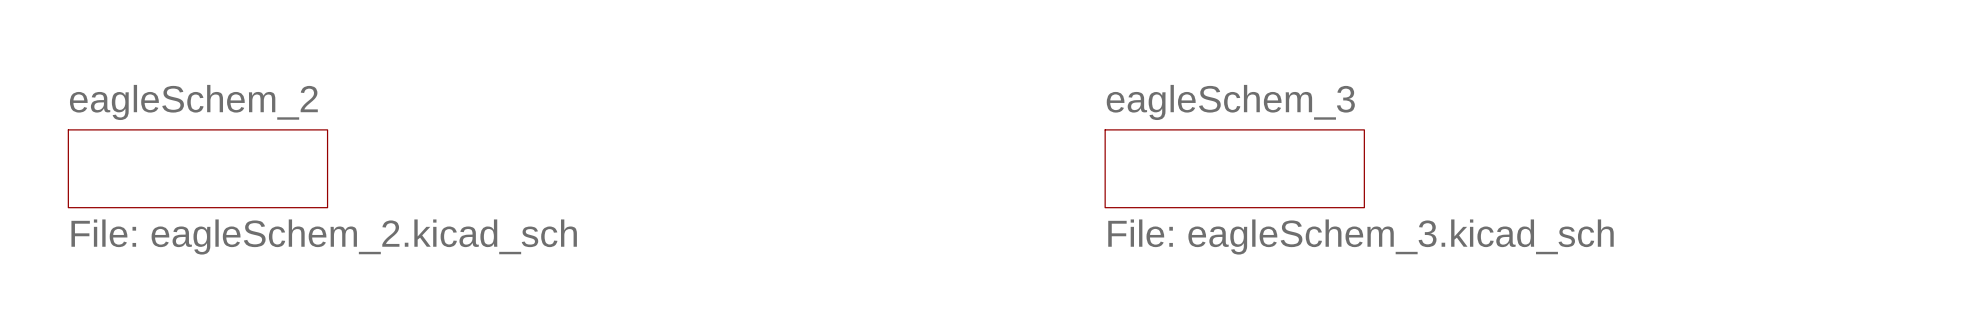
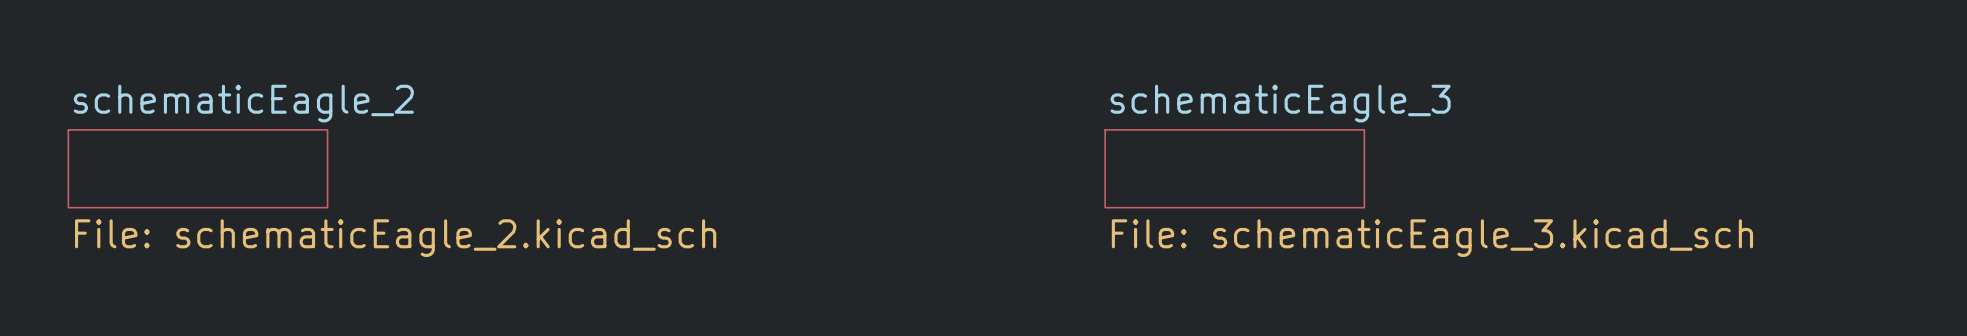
sheet eagleSchem_2 name: eagleSchem_2 (193, 102) -> schematicEagle_2 (243, 103)
sheet eagleSchem_3 name: eagleSchem_3 (1230, 102) -> schematicEagle_3 (1280, 103)
sheet eagleSchem_2 value: File: eagleSchem_2.kicad_sch (324, 237) -> File: schematicEagle_2.kicad_sch (395, 238)
sheet eagleSchem_3 value: File: eagleSchem_3.kicad_sch (1360, 237) -> File: schematicEagle_3.kicad_sch (1432, 238)

